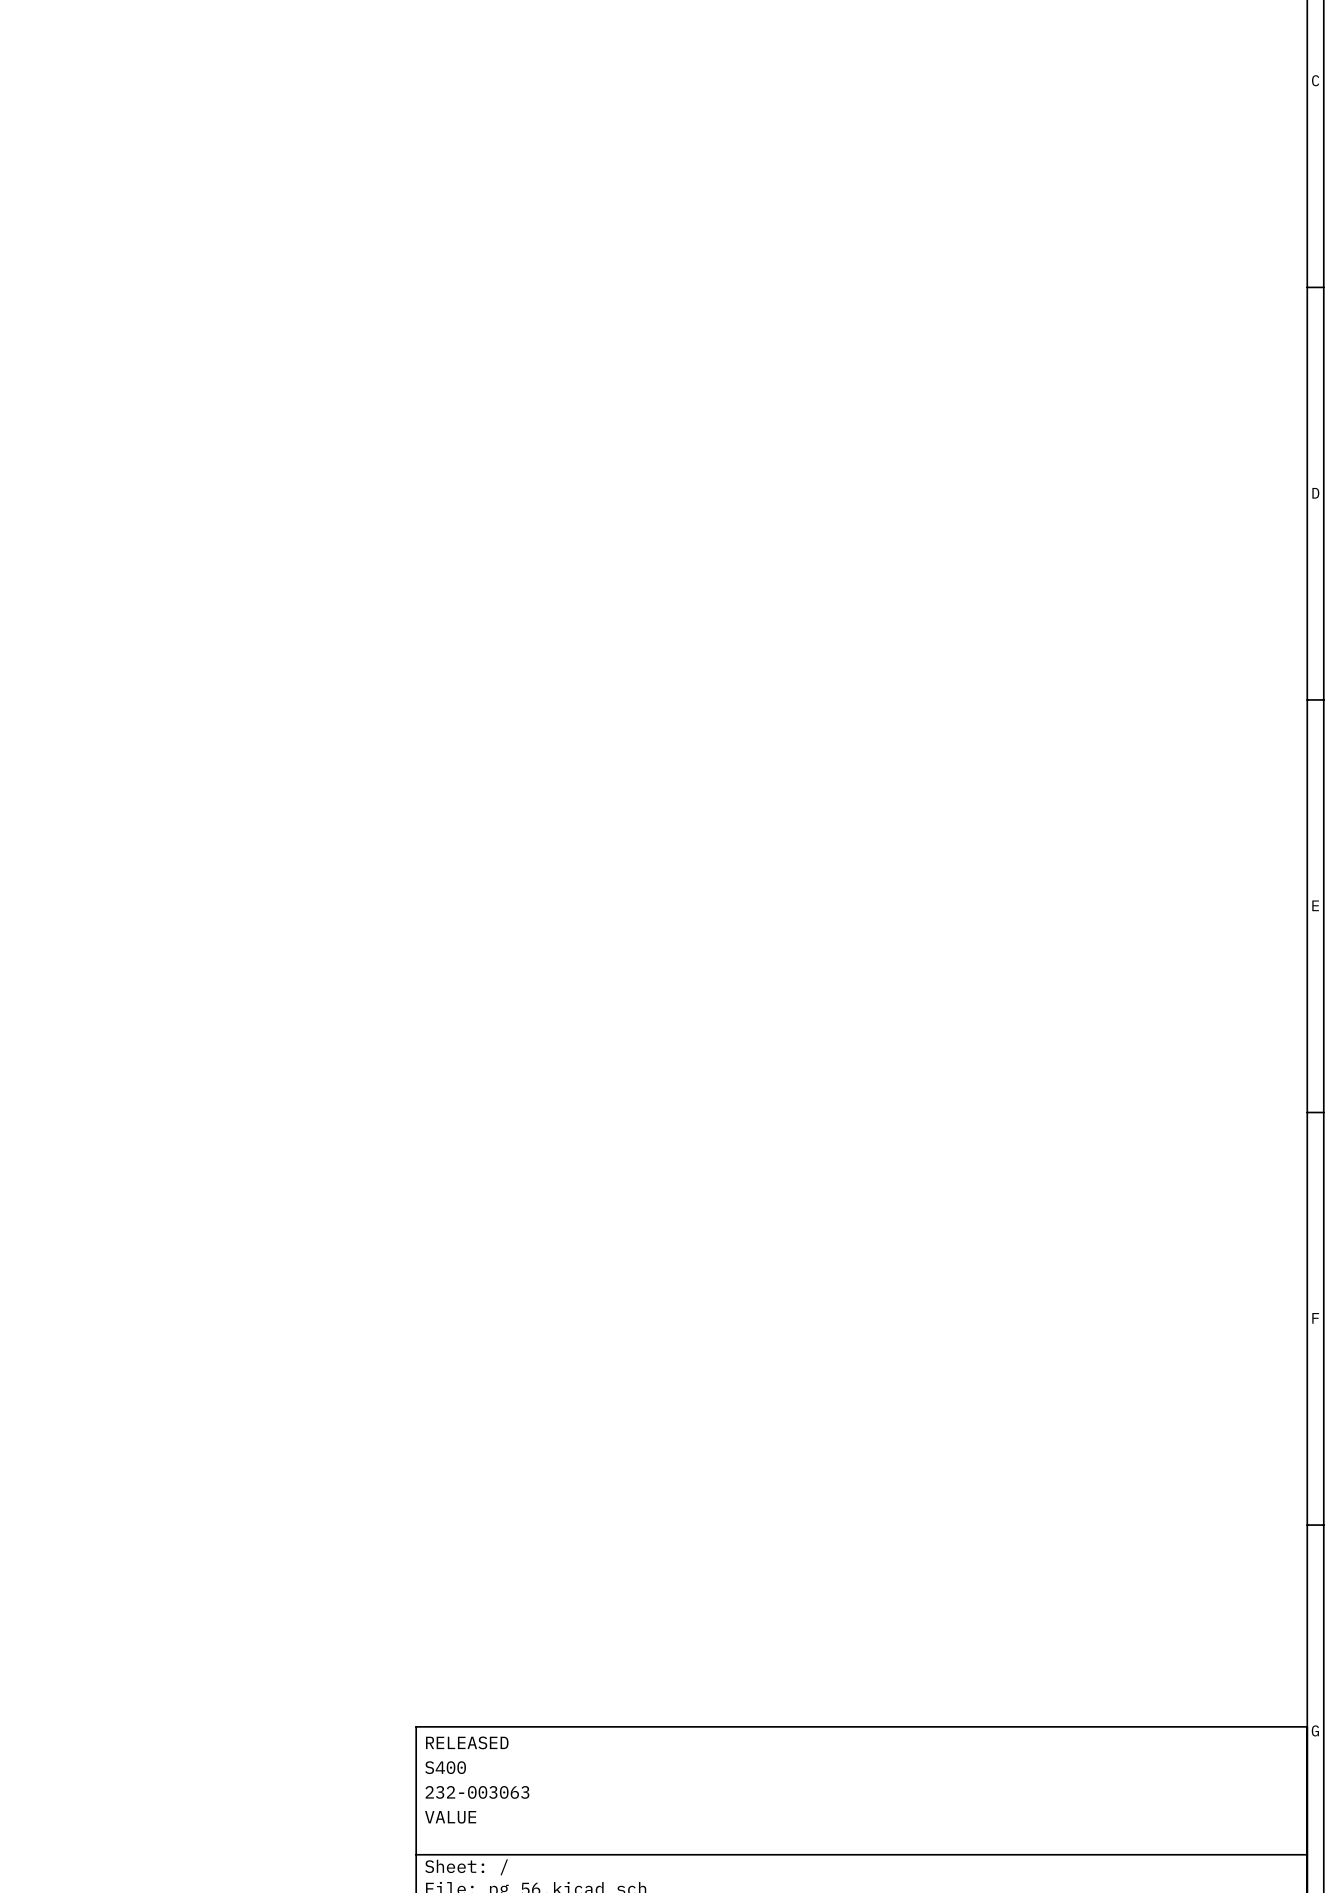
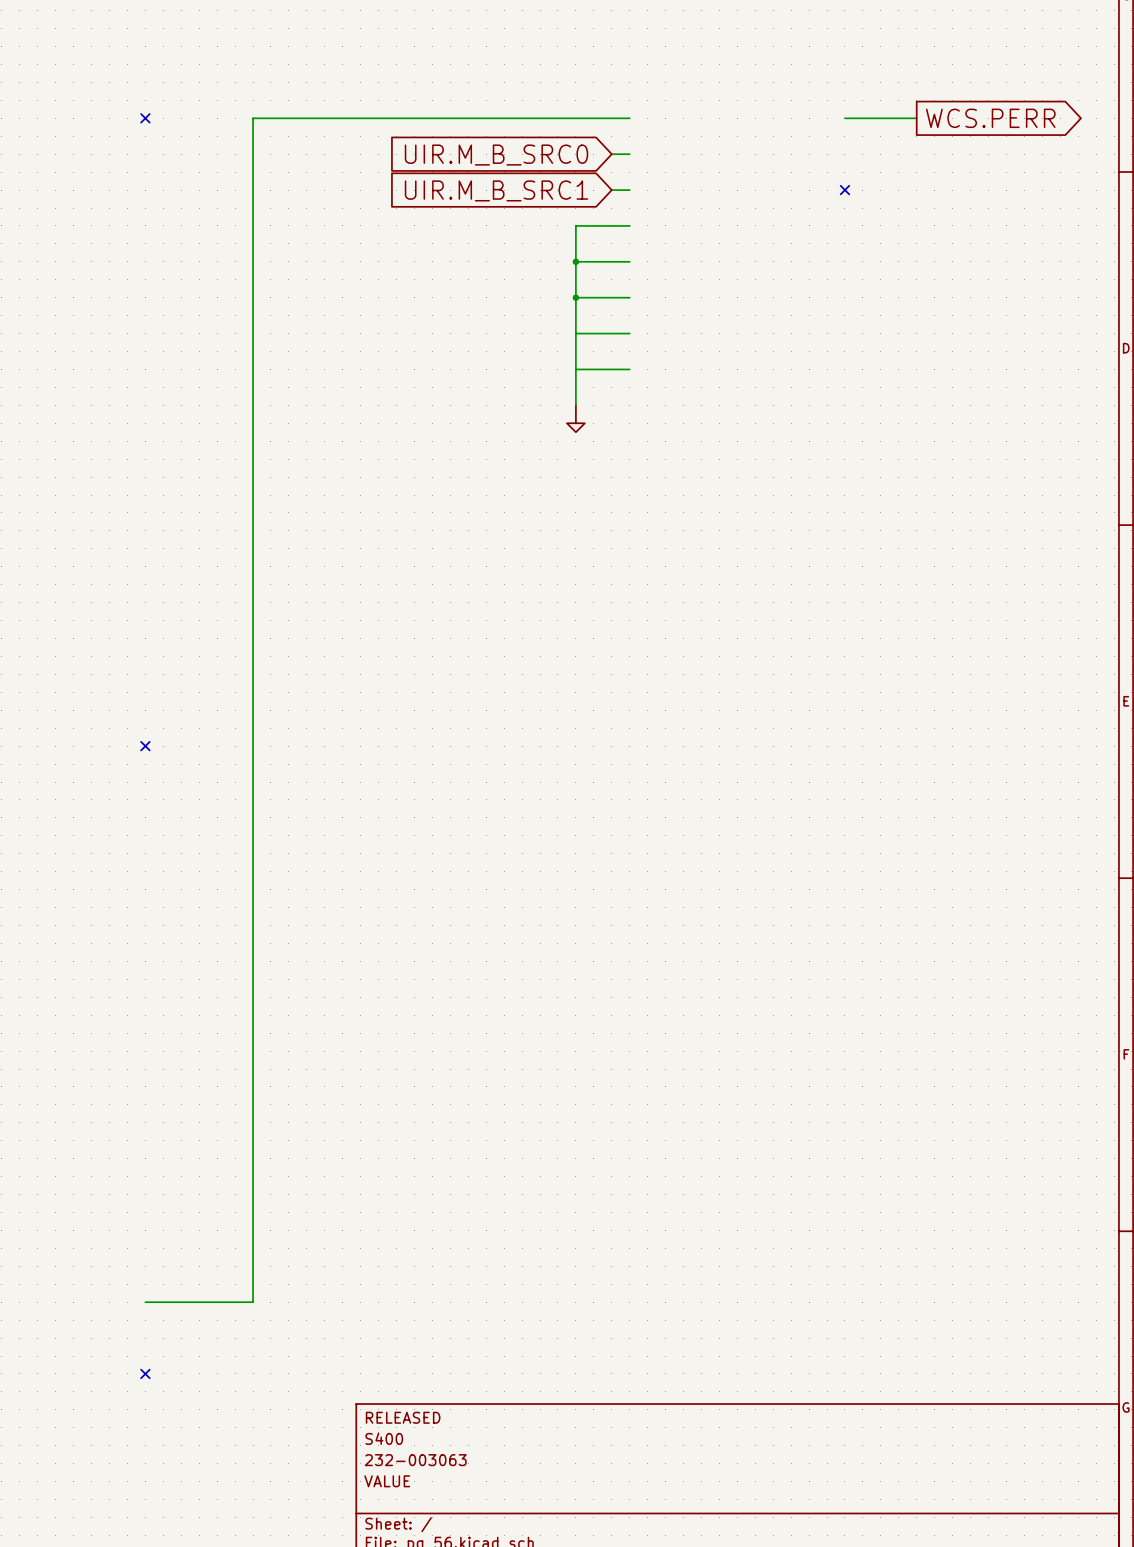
no-connect mark: none -> (145, 118)
wire: none -> (629, 118) (253, 118) (253, 1302) (145, 1302)
wire: none -> (844, 118) (916, 118)
global label: none -> WCS.PERR (990, 118)
wire: none -> (611, 154) (629, 154)
global label: none -> UIR.M_B_SRC0 (496, 155)
wire: none -> (611, 190) (629, 190)
no-connect mark: none -> (844, 190)
global label: none -> UIR.M_B_SRC1 (496, 190)
wire: none -> (629, 225) (575, 225) (575, 405)
wire: none -> (575, 261) (629, 261)
junction: none -> (575, 261)
wire: none -> (575, 297) (629, 297)
junction: none -> (575, 297)
wire: none -> (575, 333) (629, 333)
wire: none -> (575, 369) (629, 369)
power symbol: none -> (575, 419)
no-connect mark: none -> (145, 746)
no-connect mark: none -> (145, 1373)

